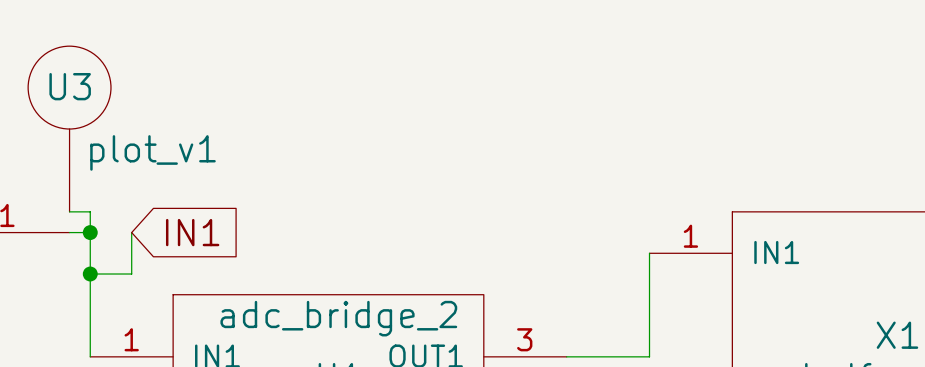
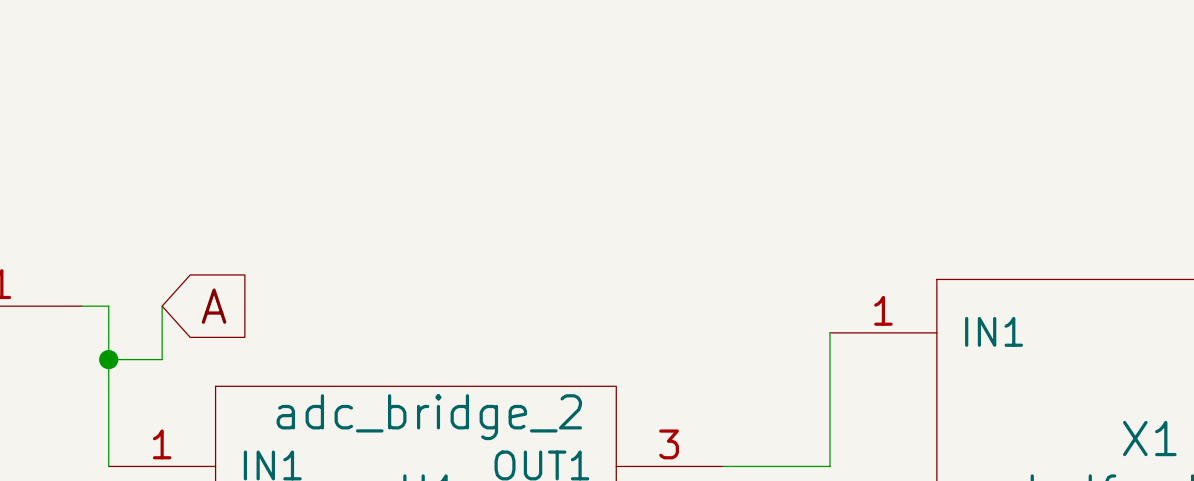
U3: plot_v1 (69, 129) -> none
wire: (69, 211) (90, 211) (90, 232) -> none
junction: (90, 232) -> none
global label: IN1 (192, 232) -> A (214, 306)

